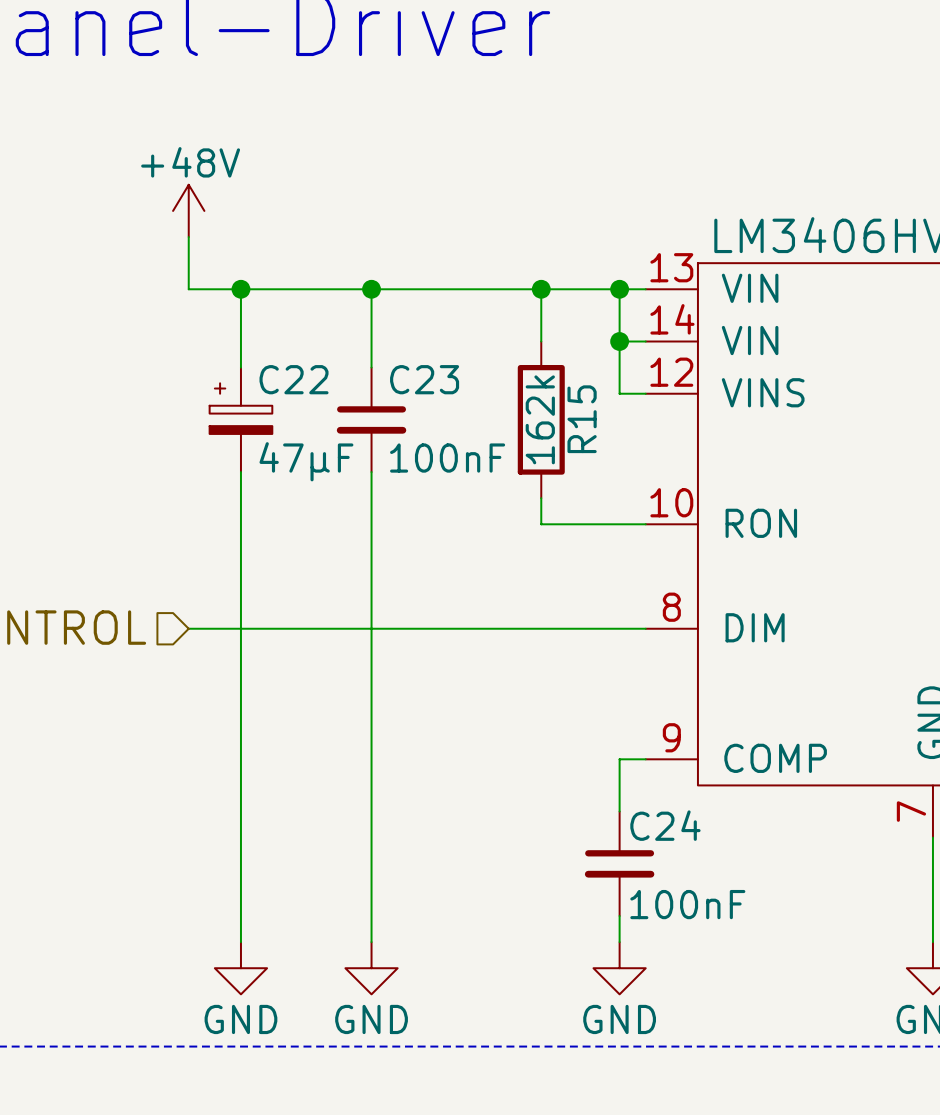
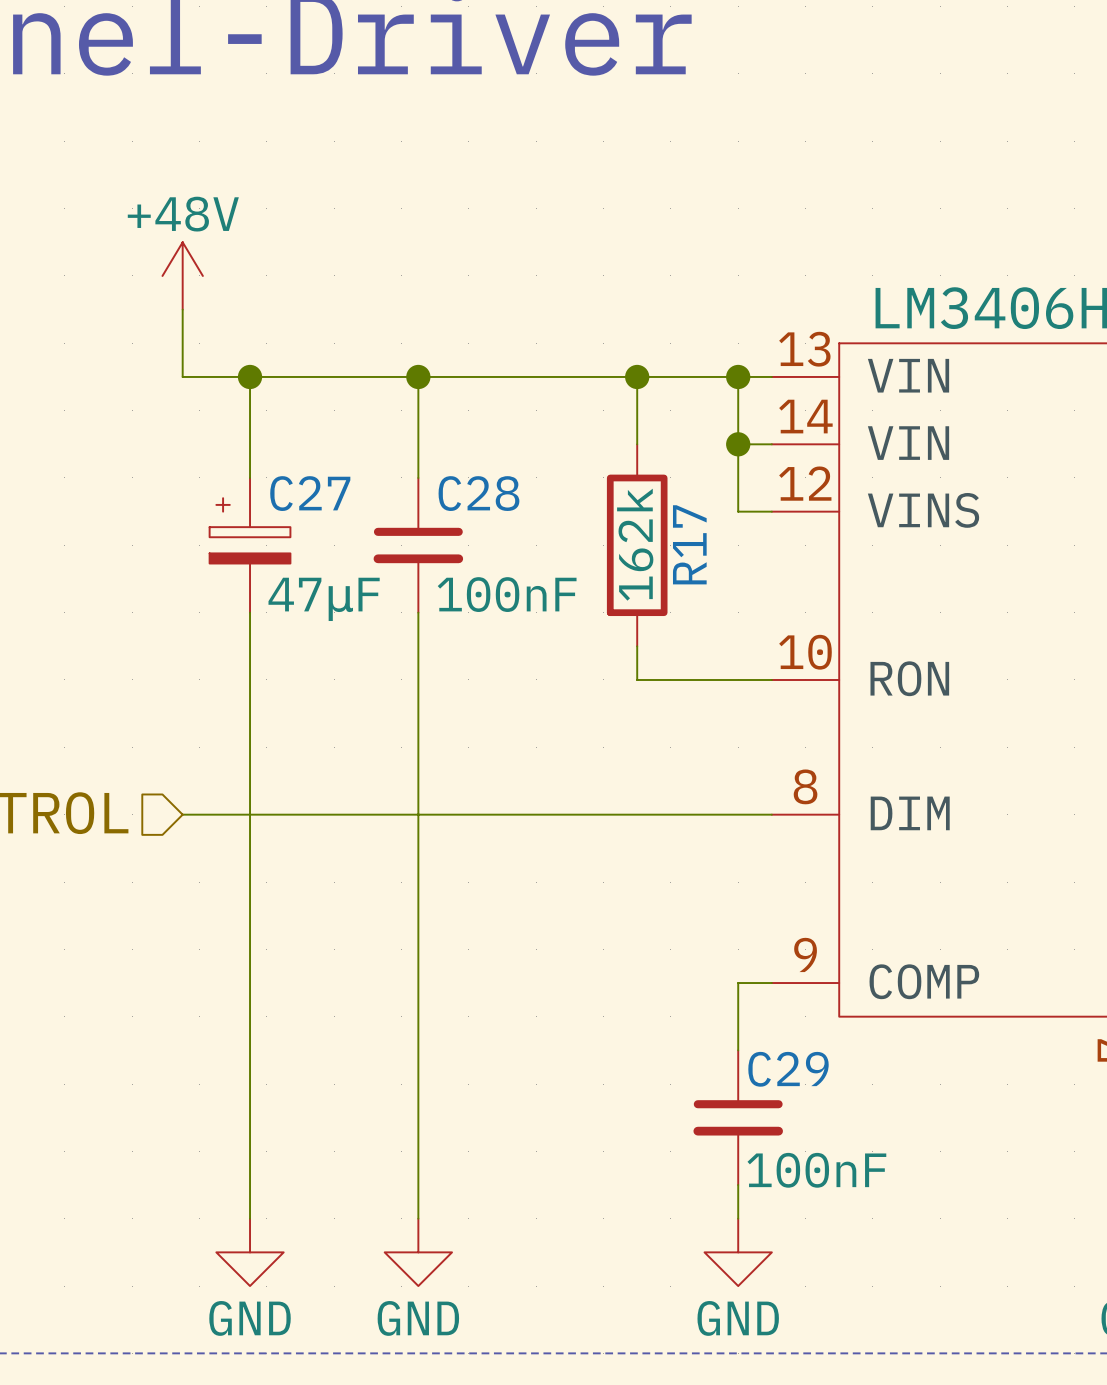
C22 name: C22 (294, 379) -> C27 (310, 493)
C23 name: C23 (424, 379) -> C28 (478, 493)
R15 name: R15 (582, 419) -> R17 (689, 544)
C24 name: C24 (665, 825) -> C29 (788, 1069)

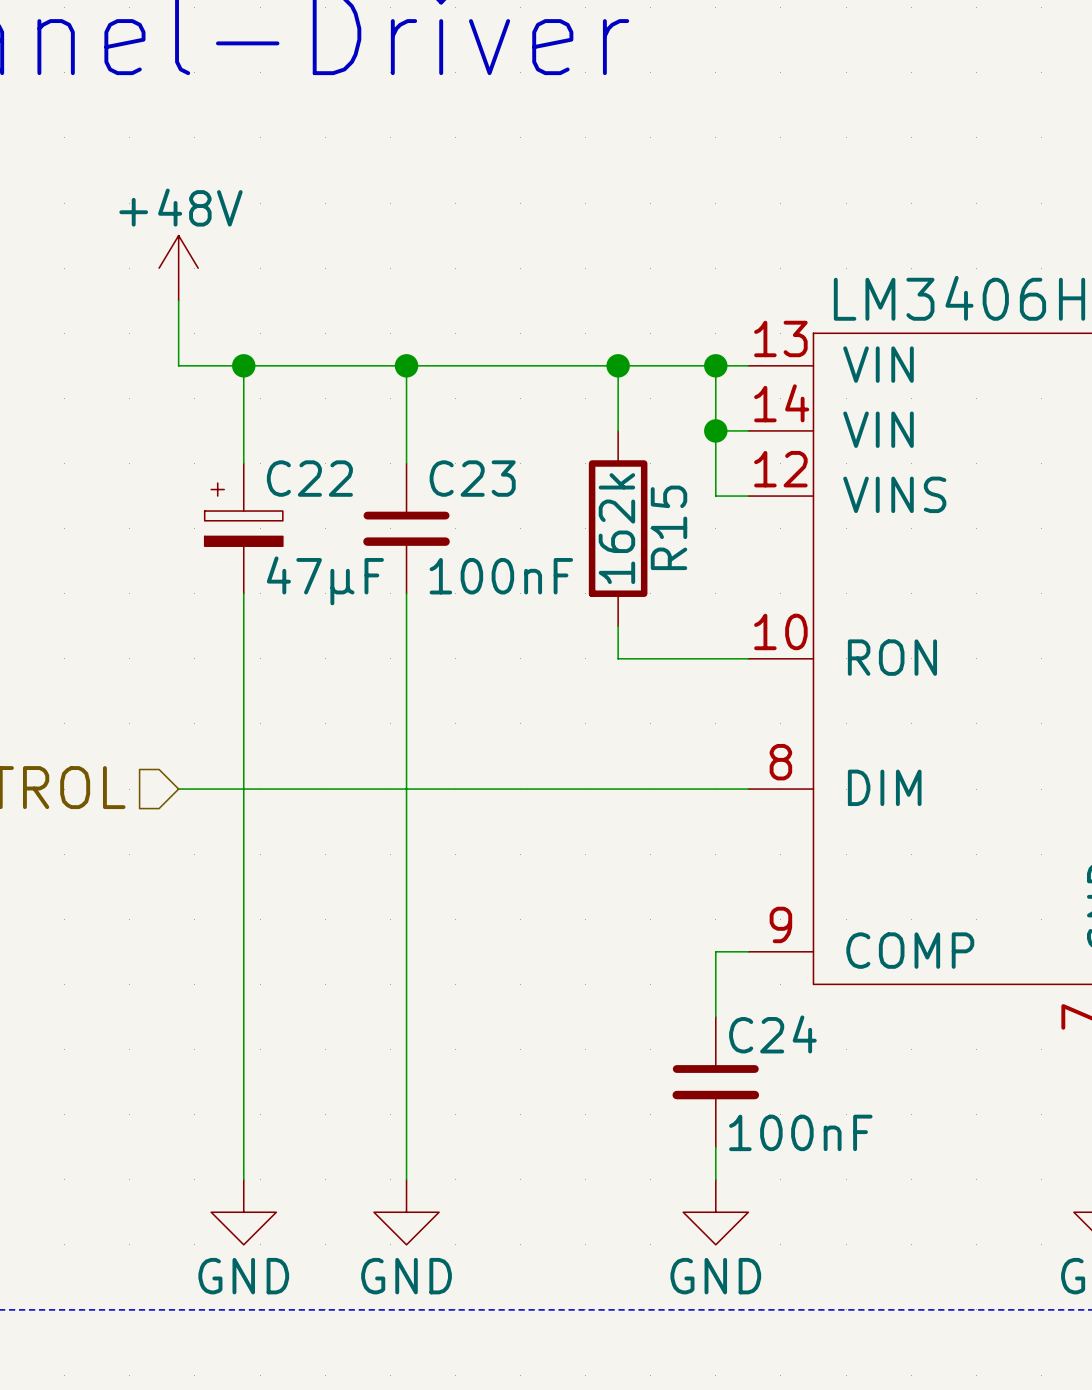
C27 name: C27 (310, 493) -> C22 (309, 478)
C28 name: C28 (478, 493) -> C23 (472, 478)
R17 name: R17 (689, 544) -> R15 (669, 527)
C29 name: C29 (788, 1069) -> C24 (772, 1034)

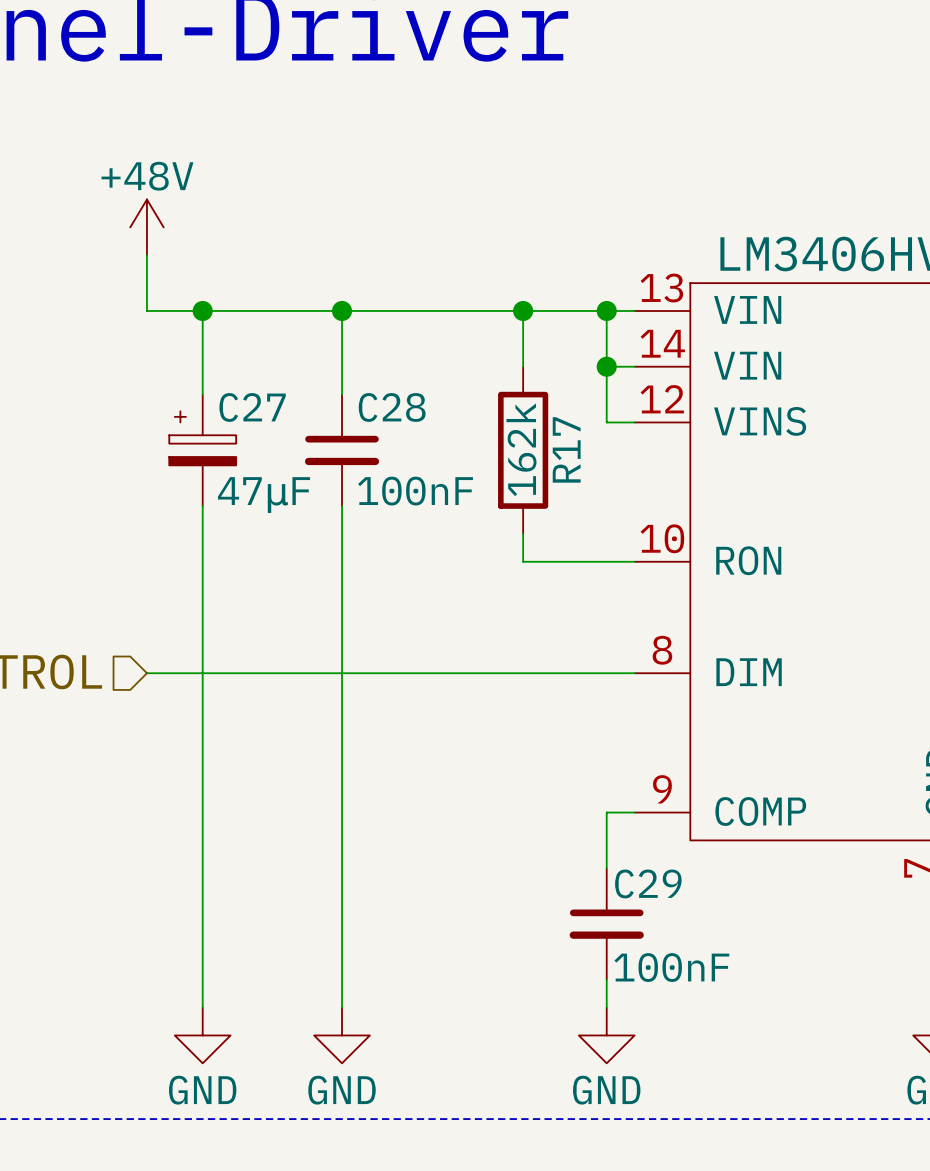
C22 name: C22 (309, 478) -> C27 (252, 407)
C23 name: C23 (472, 478) -> C28 (392, 407)
R15 name: R15 (669, 527) -> R17 (566, 449)
C24 name: C24 (772, 1034) -> C29 (648, 883)

